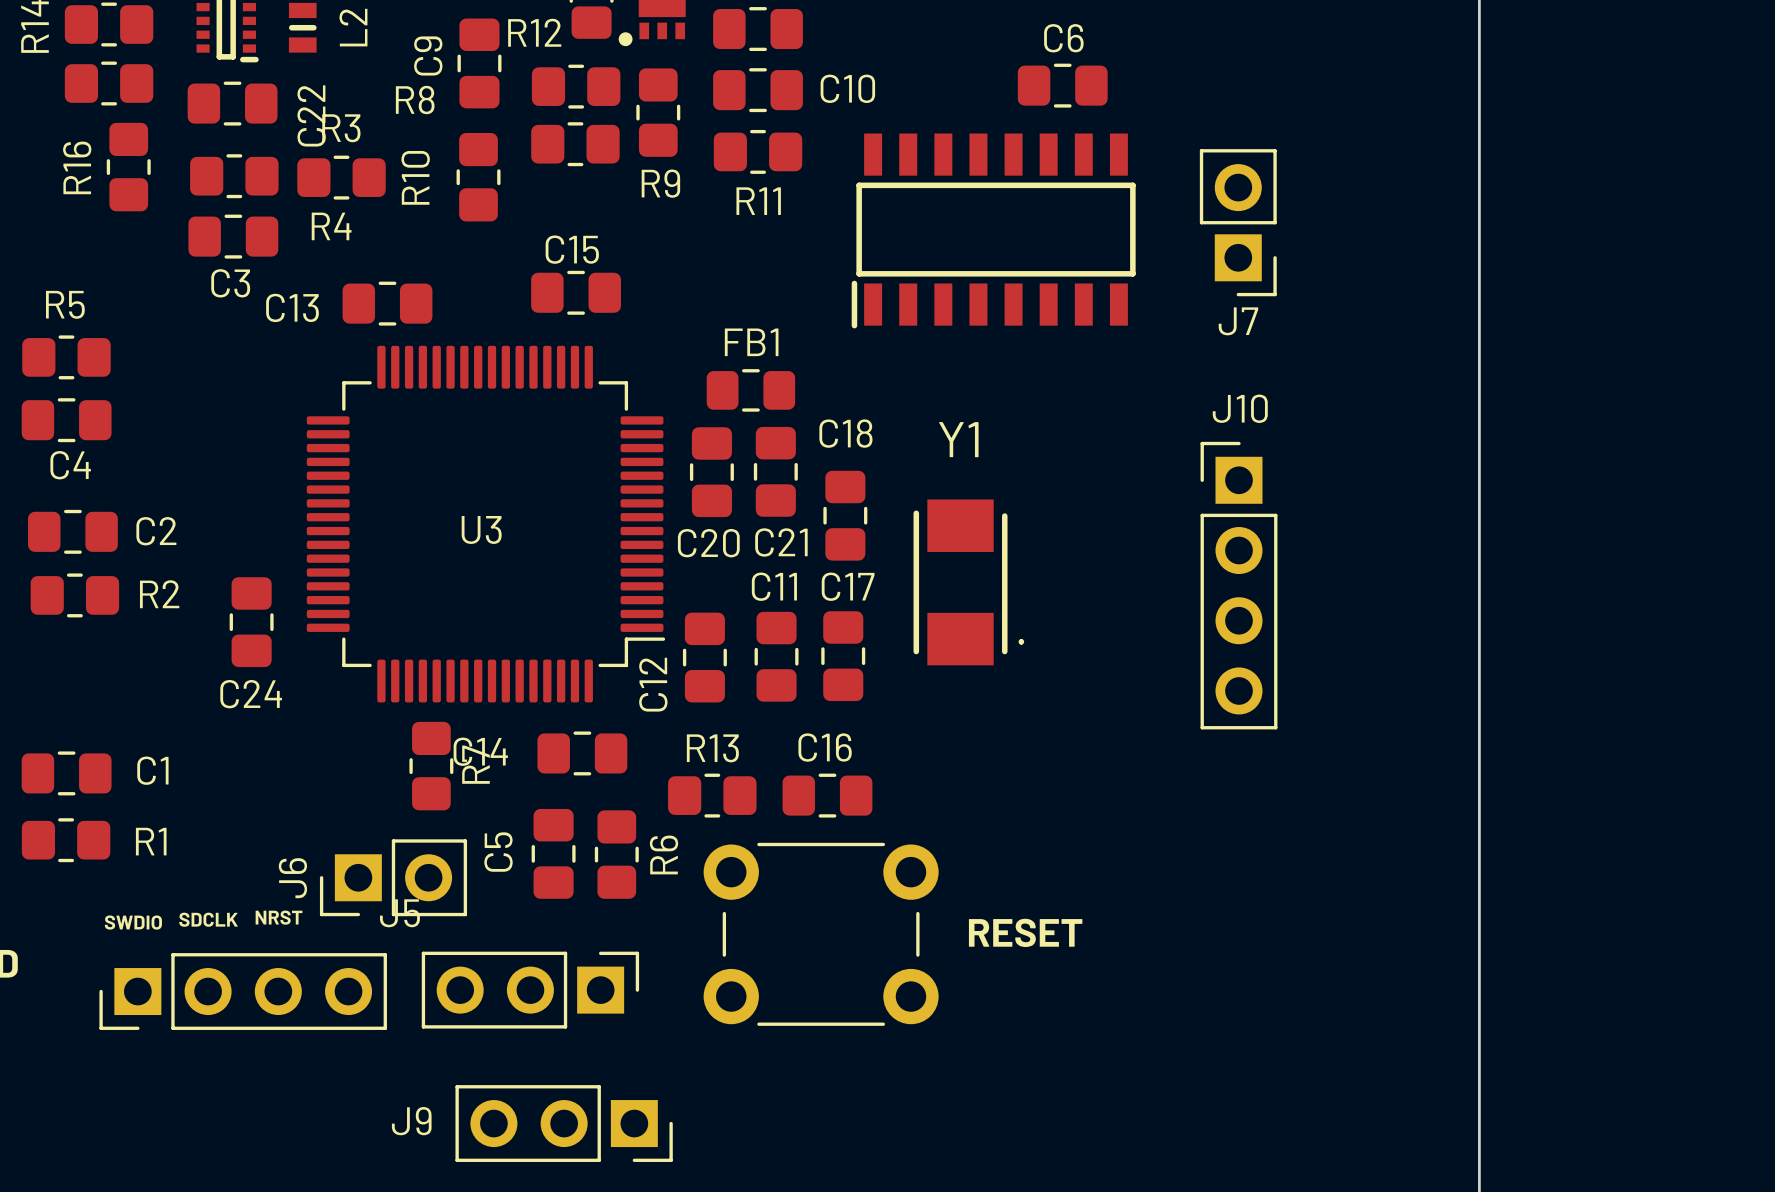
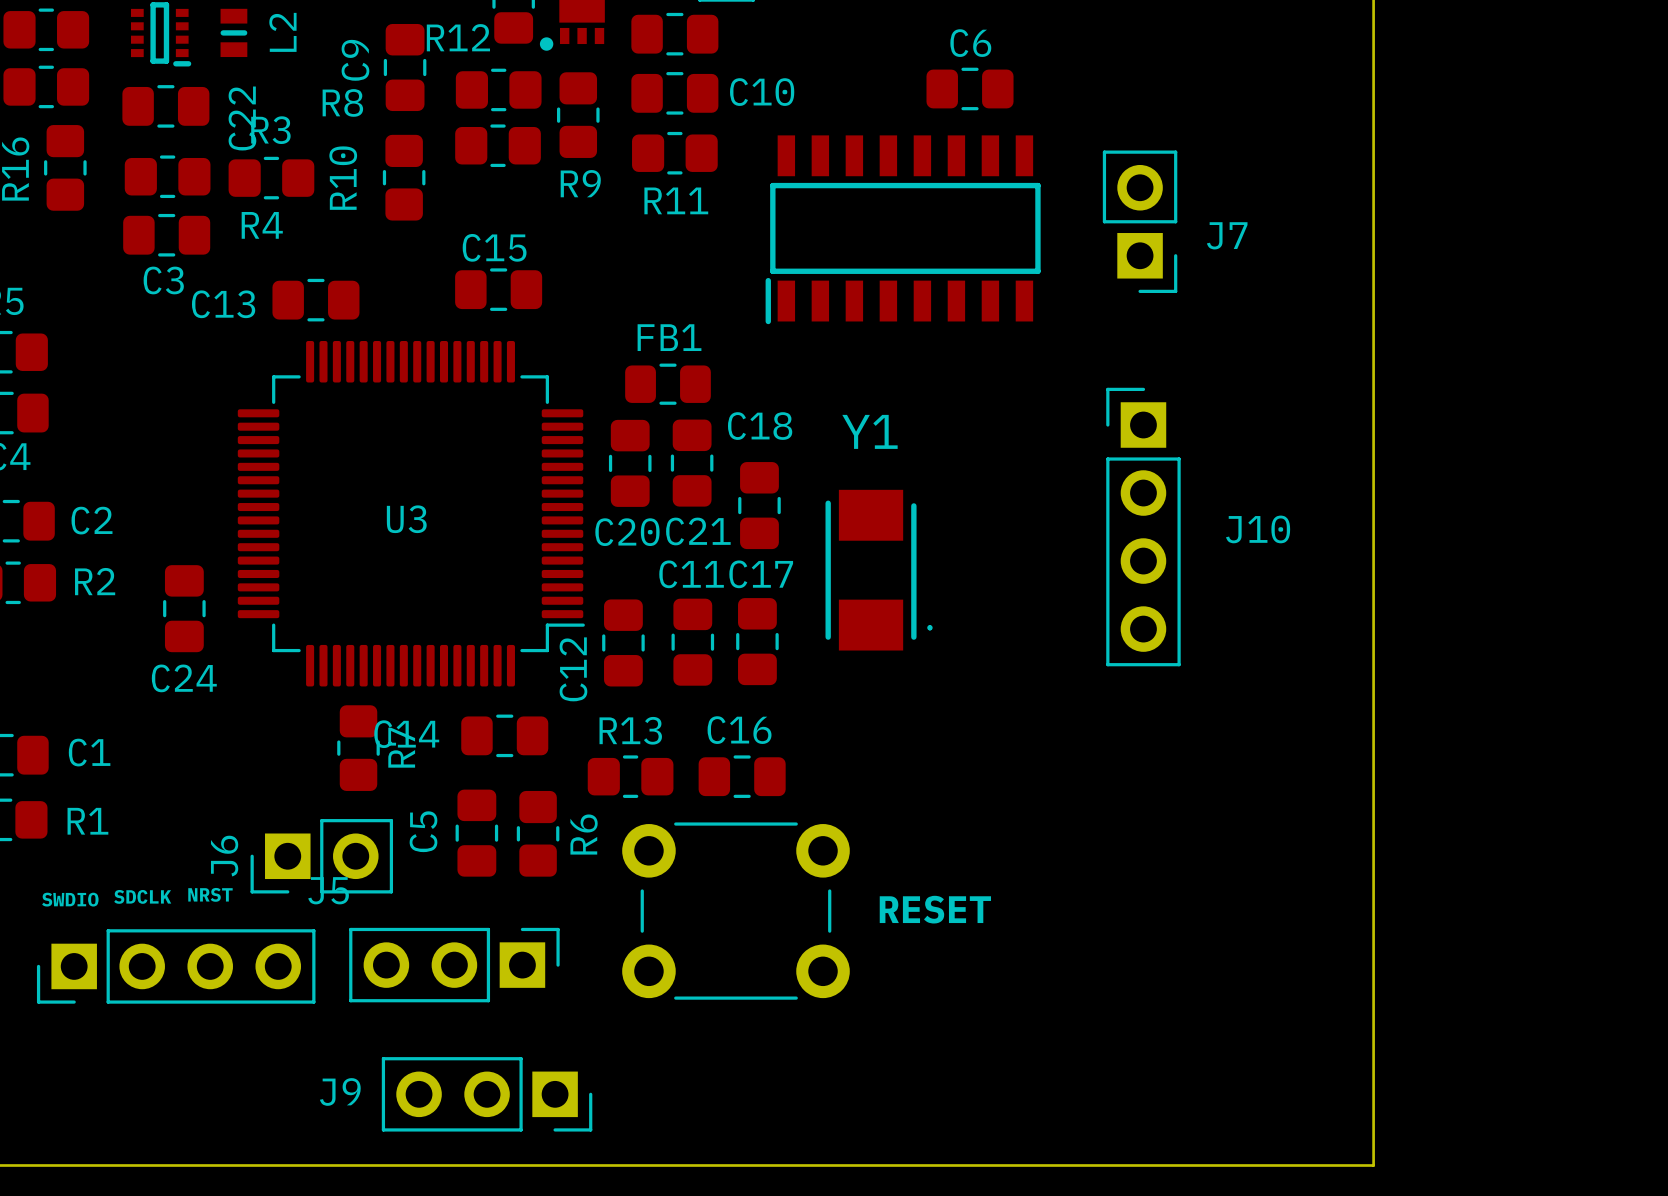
J7 name position: J7 (1238, 321) -> J7 (1227, 235)
J10 name position: J10 (1240, 408) -> J10 (1258, 529)
J10 position: (1238, 585) -> (1143, 527)

